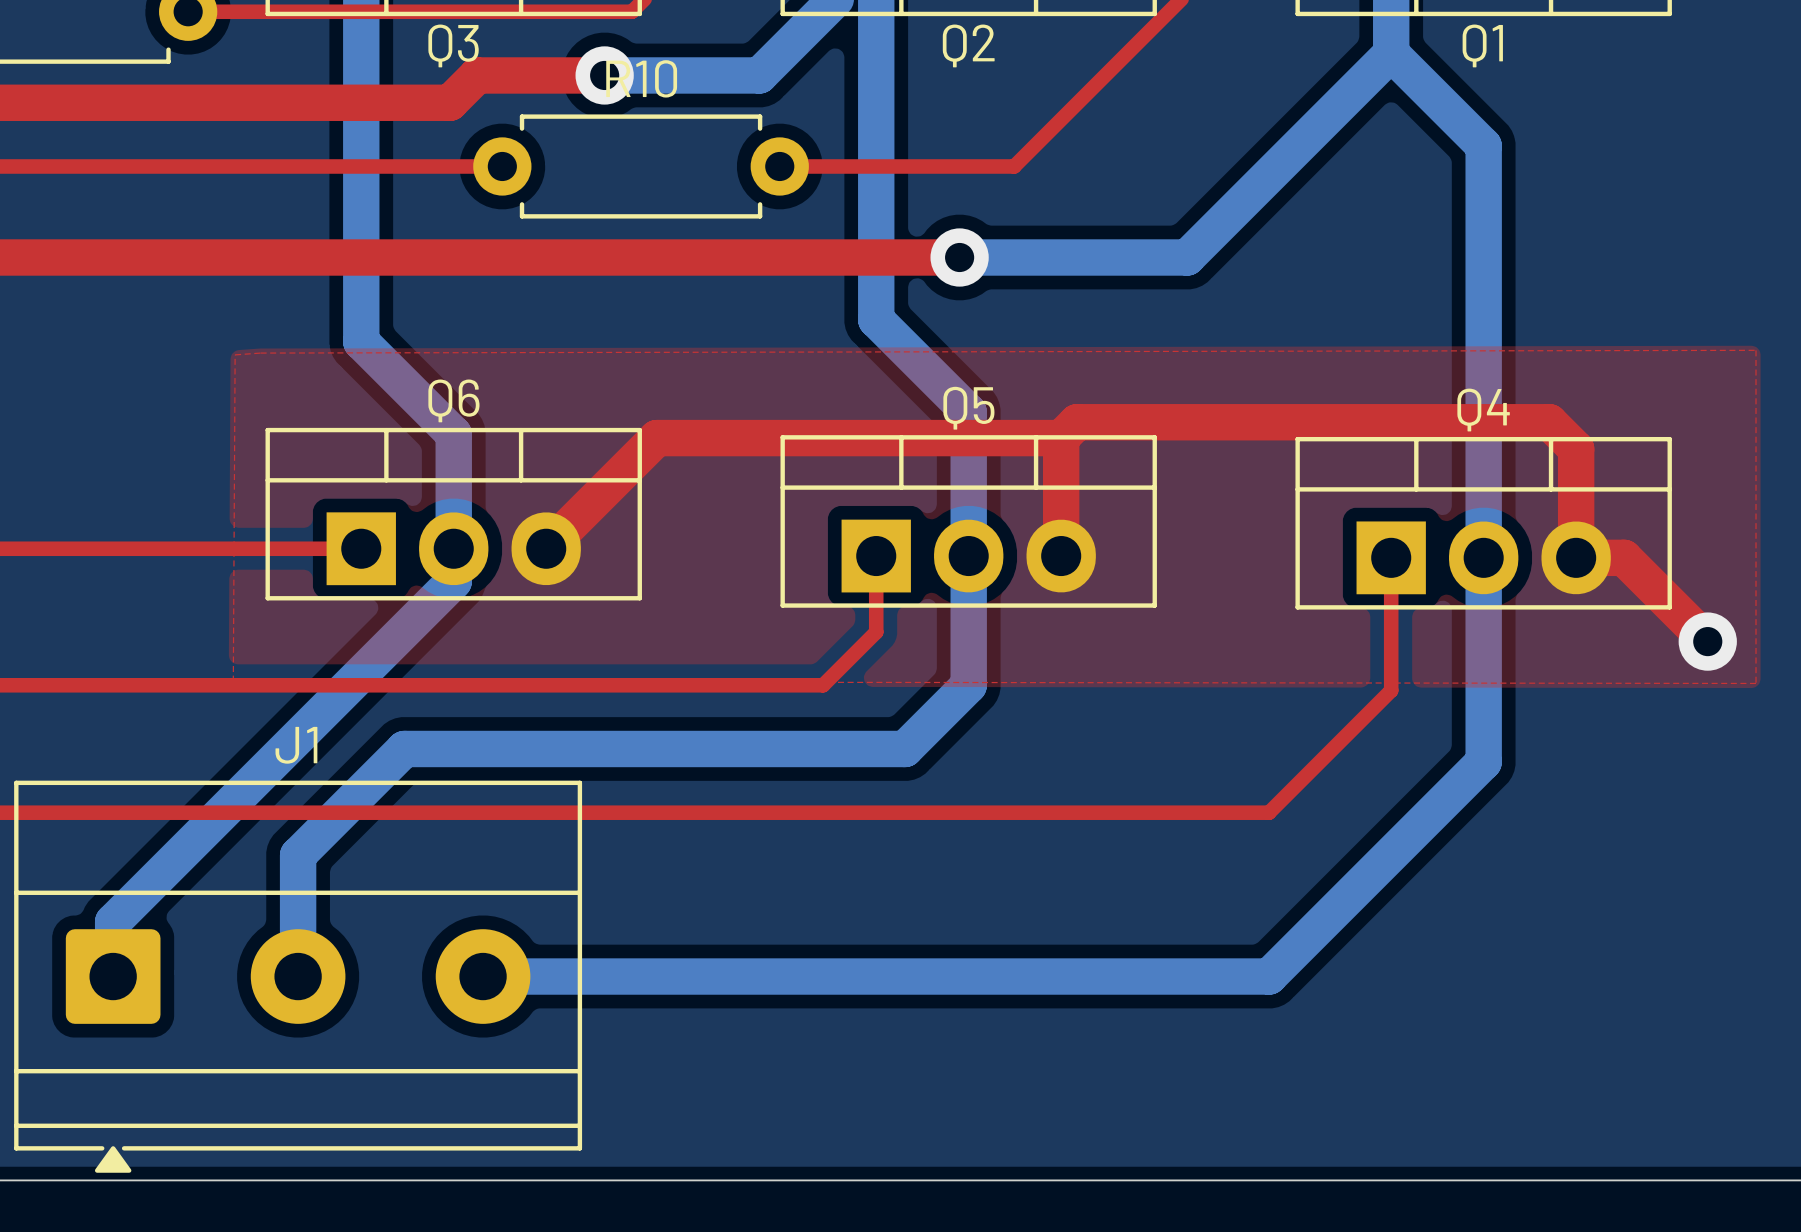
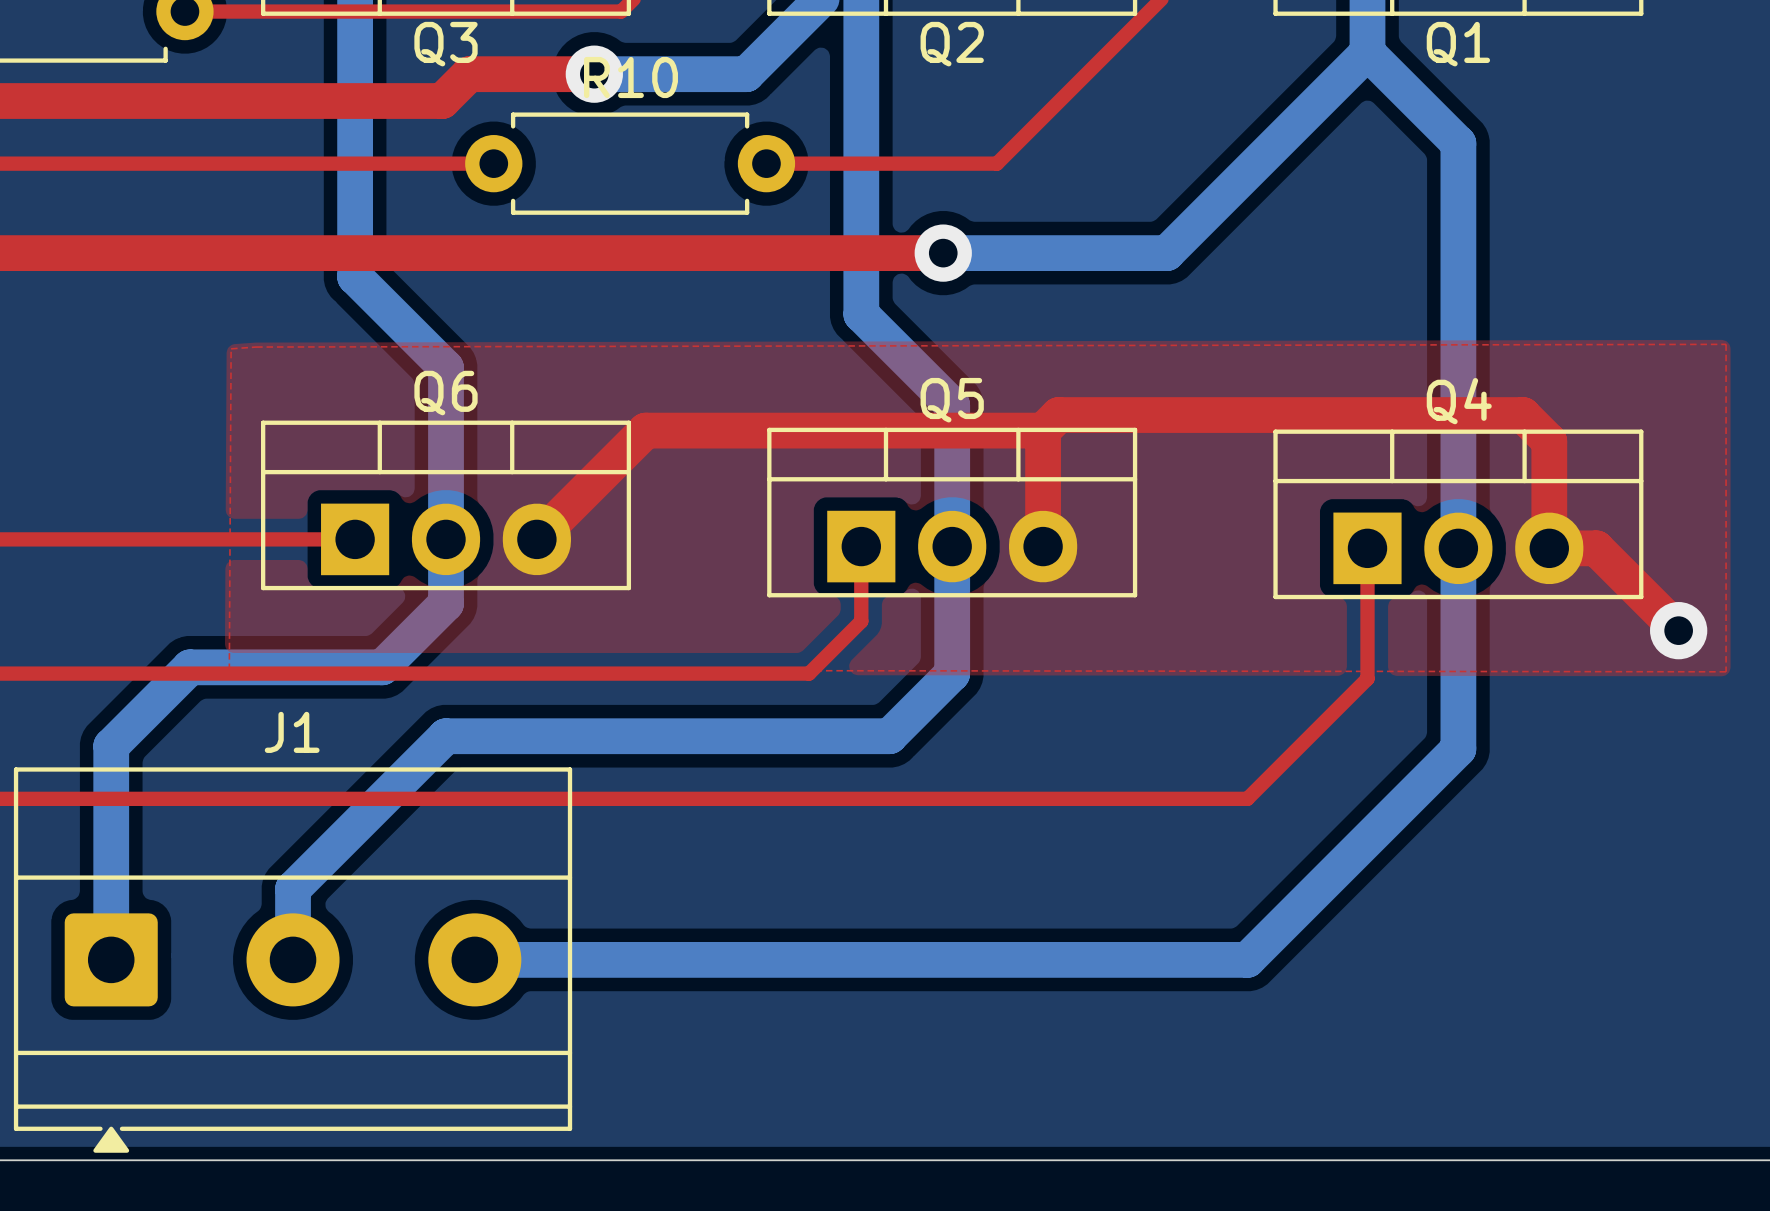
bottom track: (361, 281) (361, 341) (453, 434) -> (355, 276) (446, 367) (446, 426)
bottom track: (453, 581) (113, 921) -> (446, 571) (446, 603) (382, 667) (189, 667) (111, 746) (111, 906)
bottom track: (453, 748) (404, 748) (298, 855) (298, 904) -> (445, 736) (293, 889)

